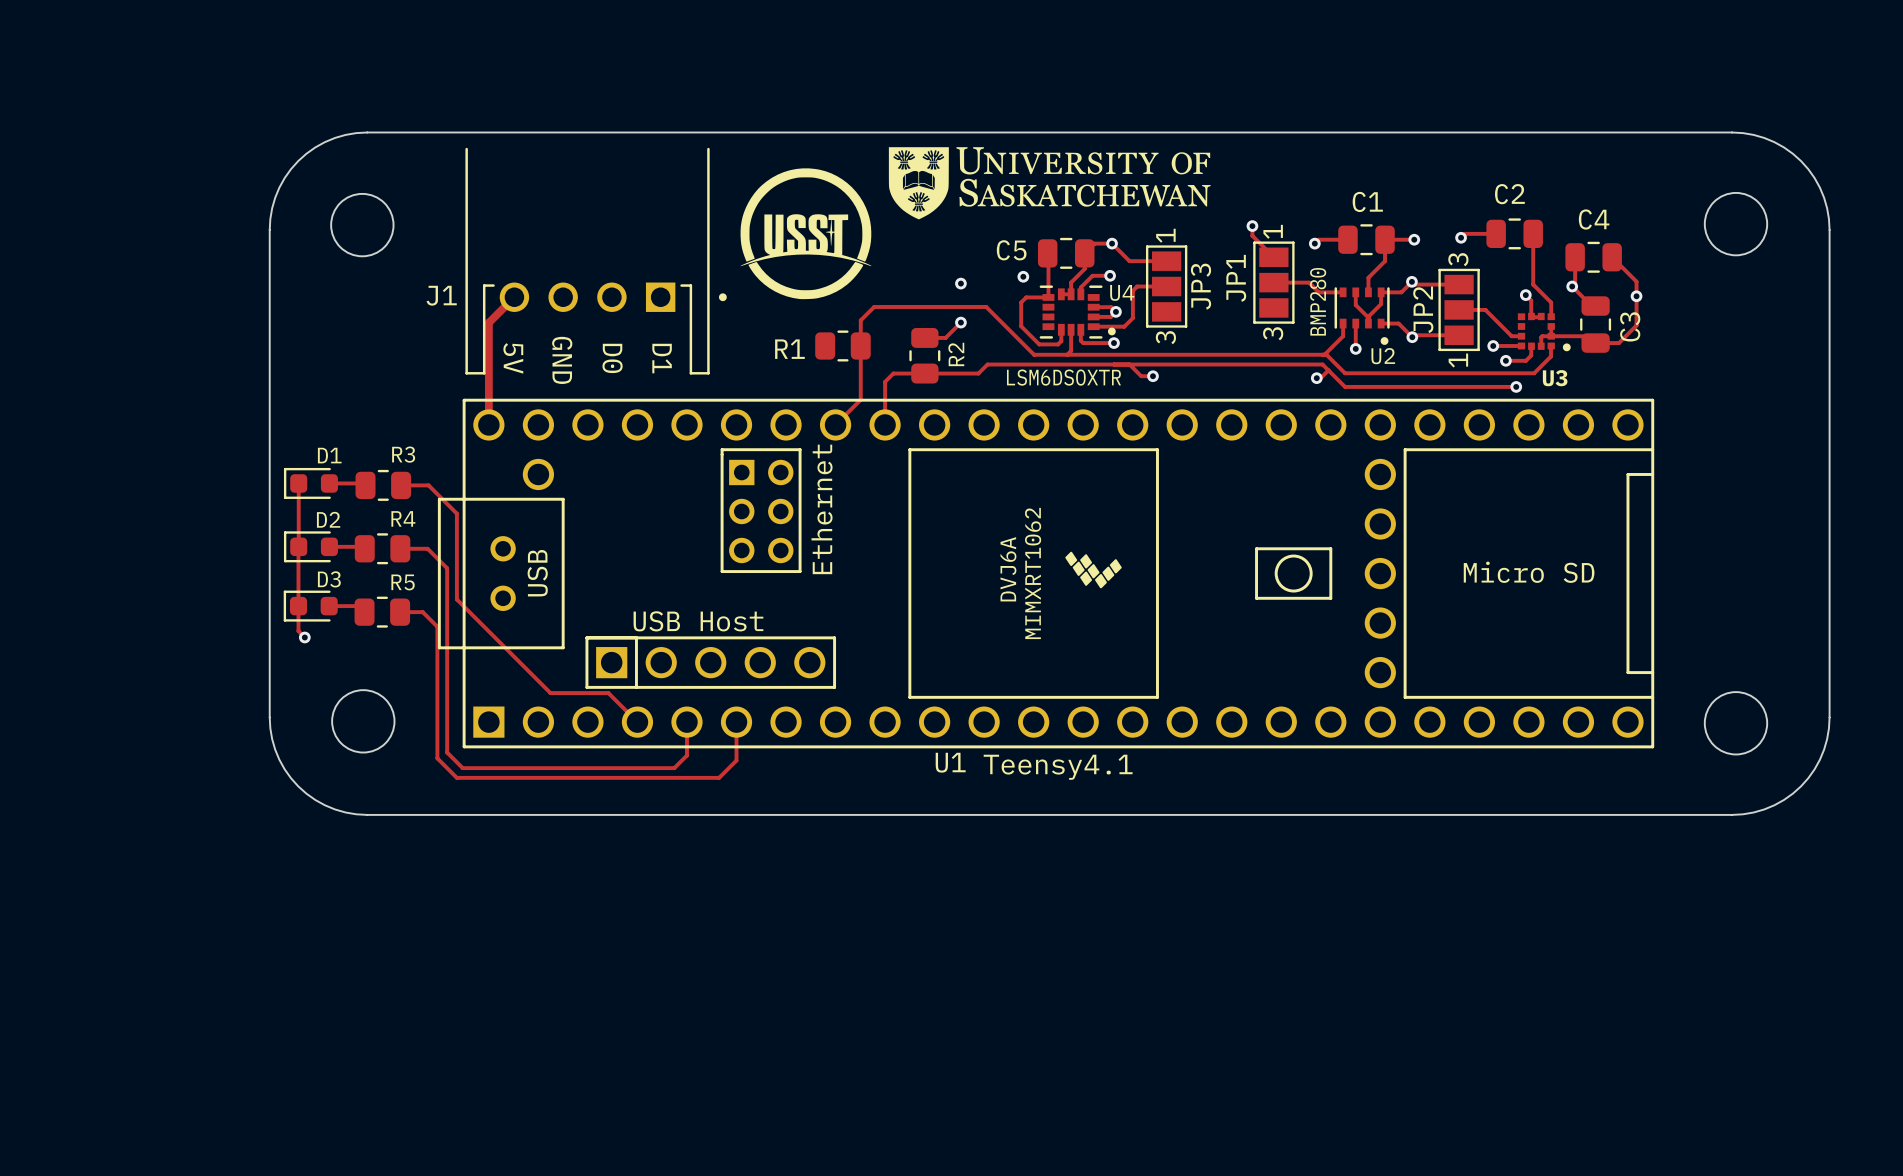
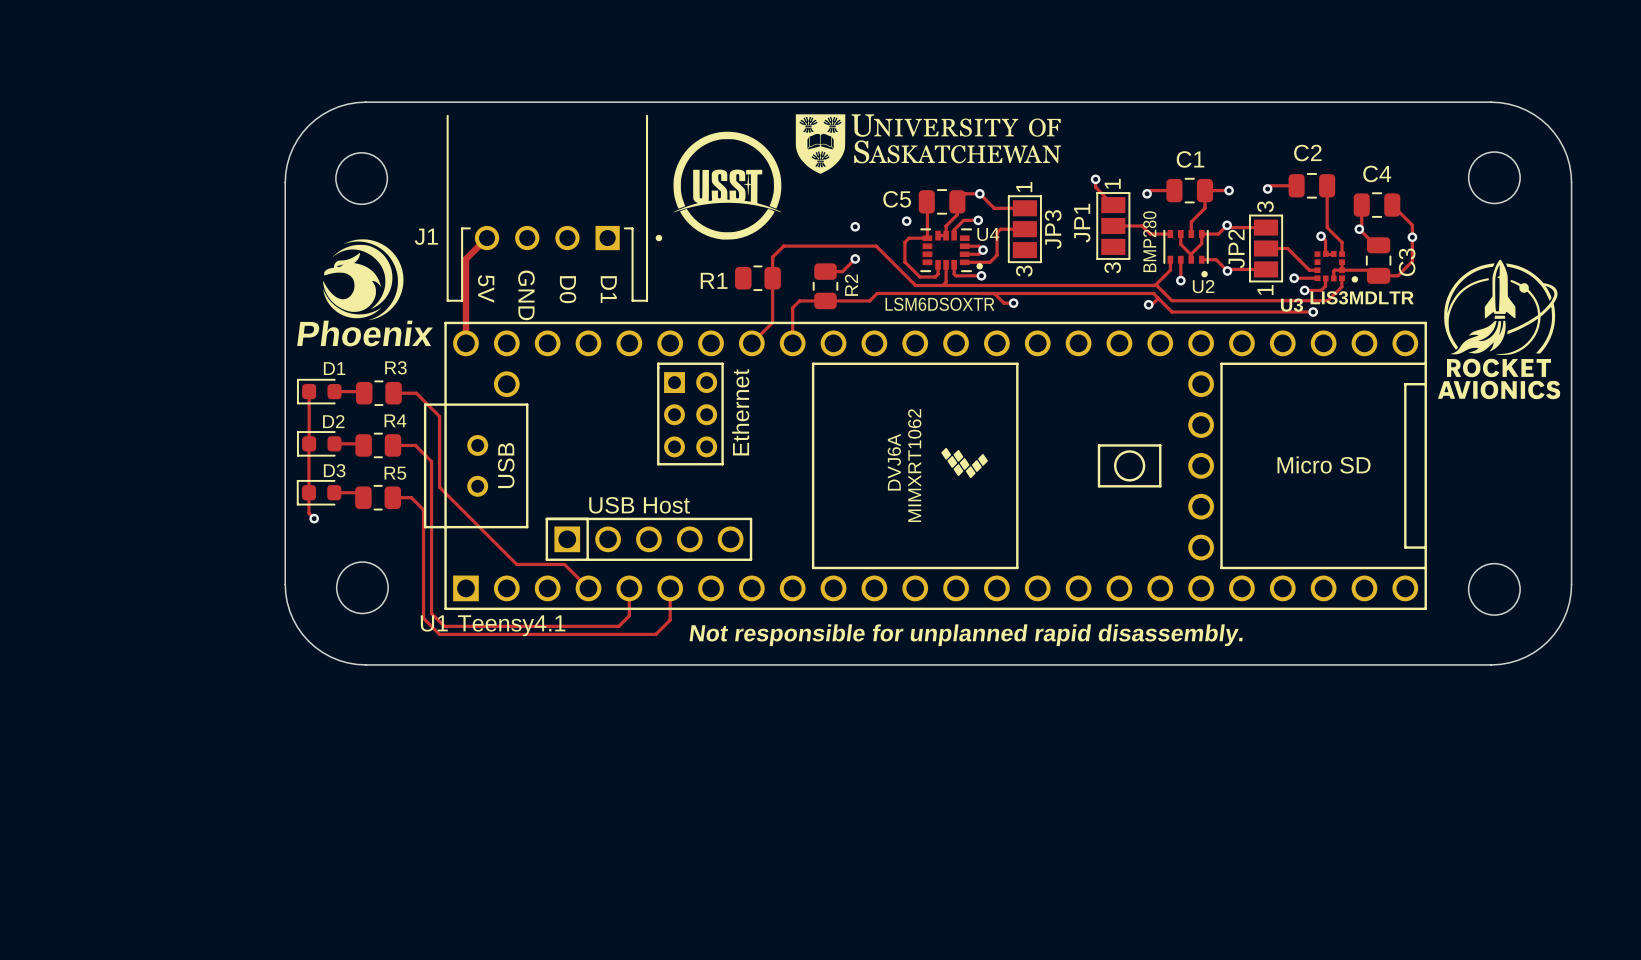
drawing: none -> [322, 239, 404, 321]
drawing: none -> [1438, 259, 1561, 400]
U3 value: none -> LIS3MDLTR (1362, 297)
U3 name position: U3 (1555, 378) -> U3 (1292, 305)
text: none -> Phoenix (365, 333)
U1 name position: U1 (950, 762) -> U1 (434, 623)
U1 value position: Teensy4.1 (1058, 767) -> Teensy4.1 (511, 625)
text: none -> Not responsible for unplanned rapid disassembly. (966, 635)

